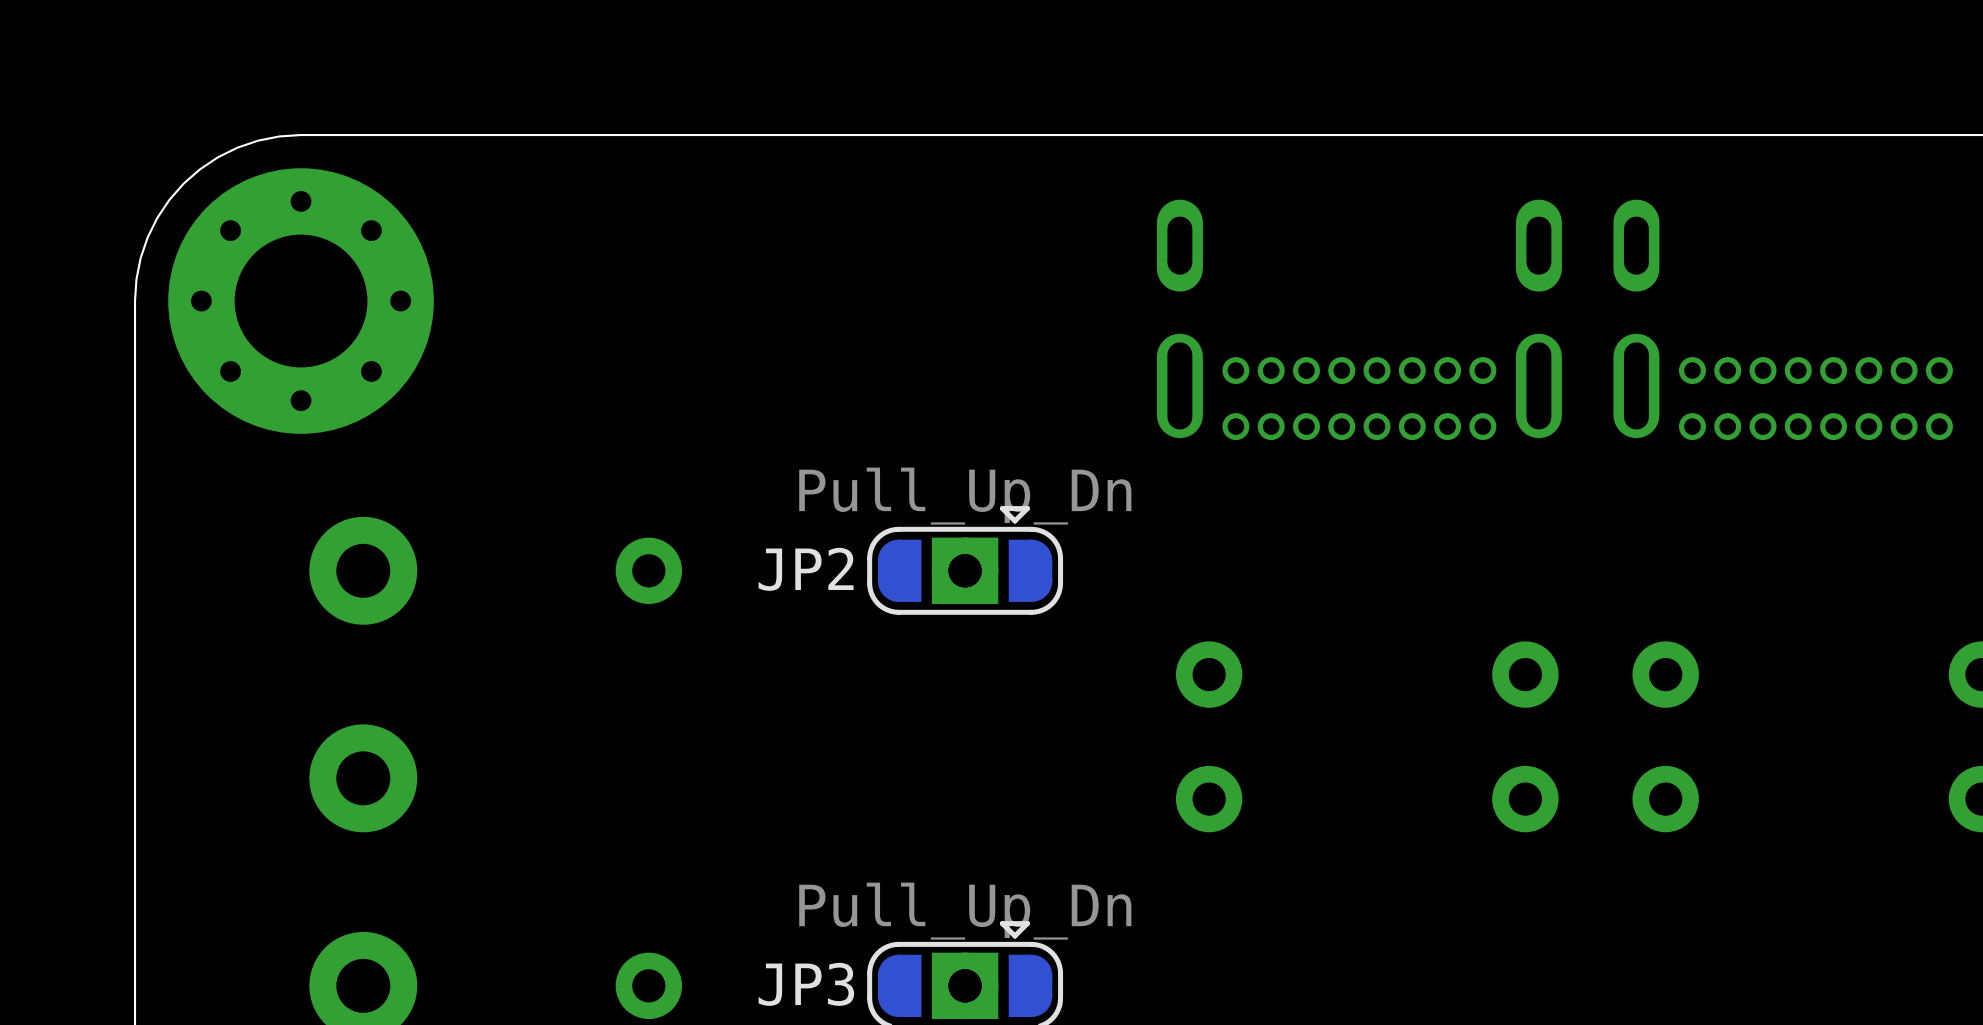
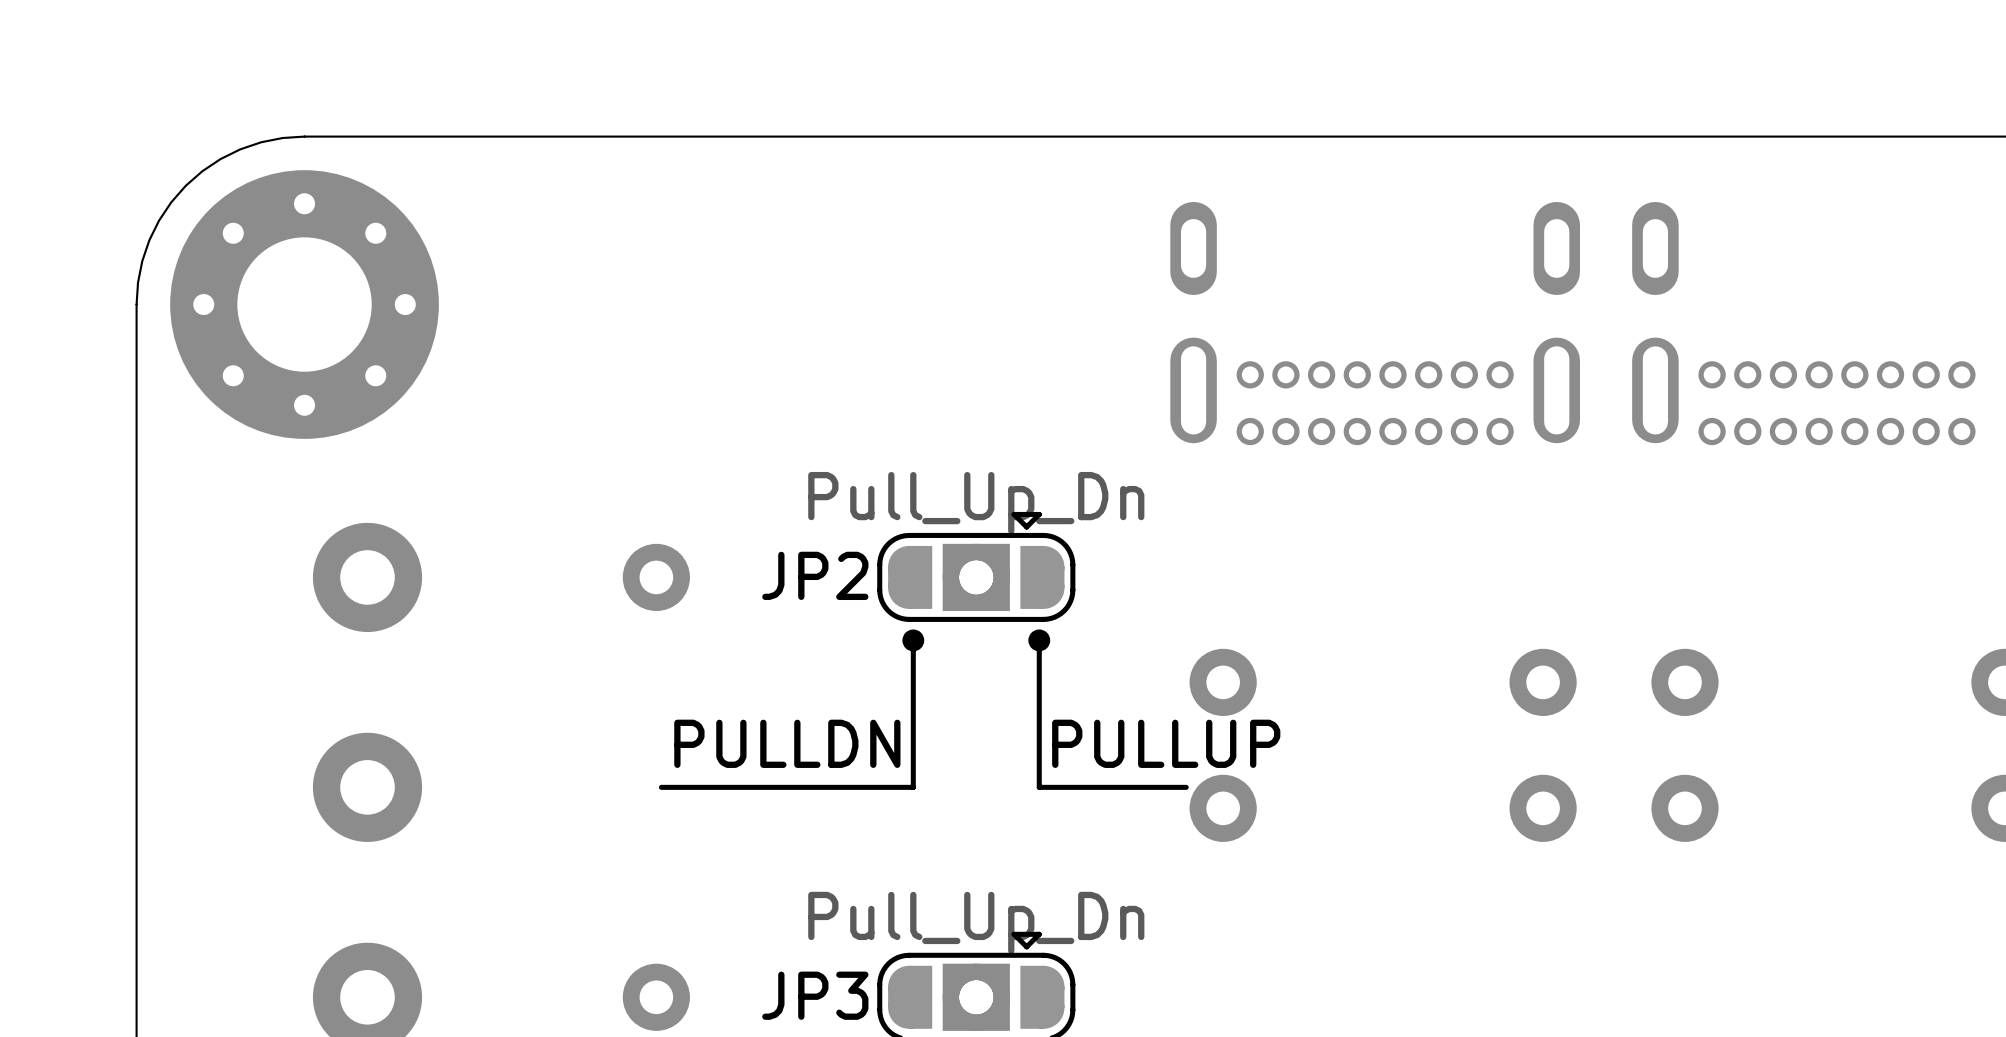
drawing: none -> [902, 629, 925, 652]
drawing: none -> [1028, 629, 1051, 652]
line: none -> (913, 640) (913, 787) (661, 787)
line: none -> (1039, 640) (1039, 787) (1186, 787)
JP2 text: none -> PULLDN (787, 743)
JP2 text: none -> PULLUP (1166, 743)

